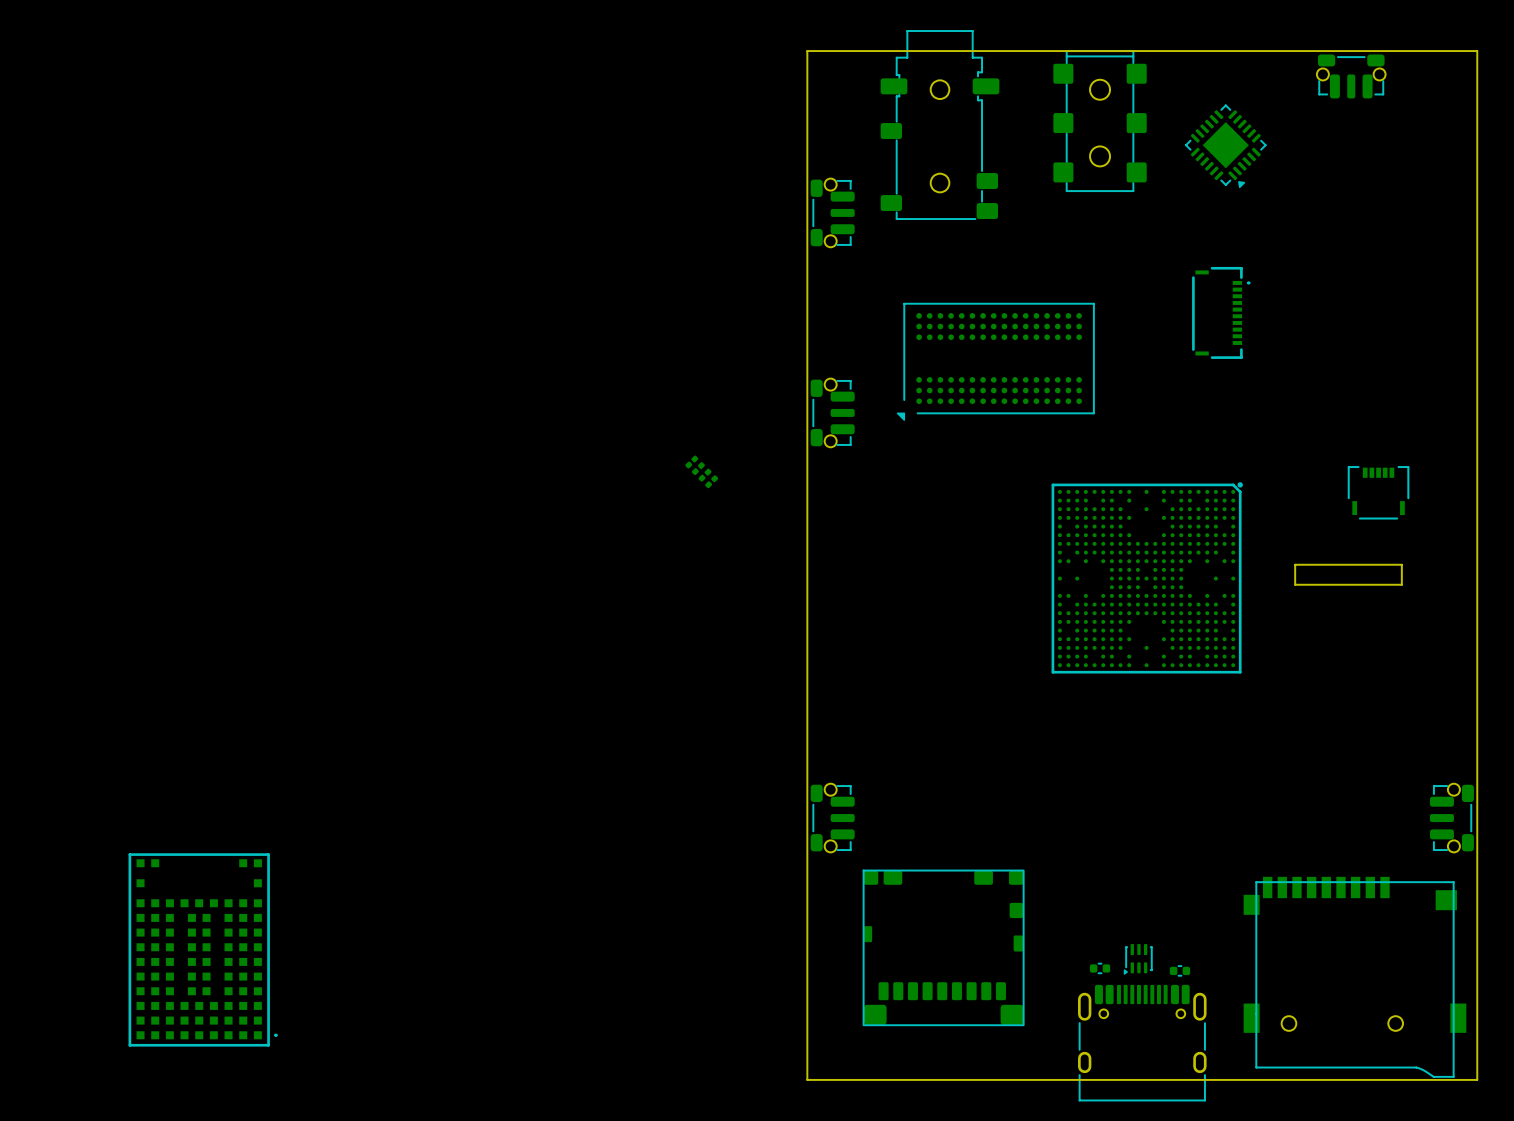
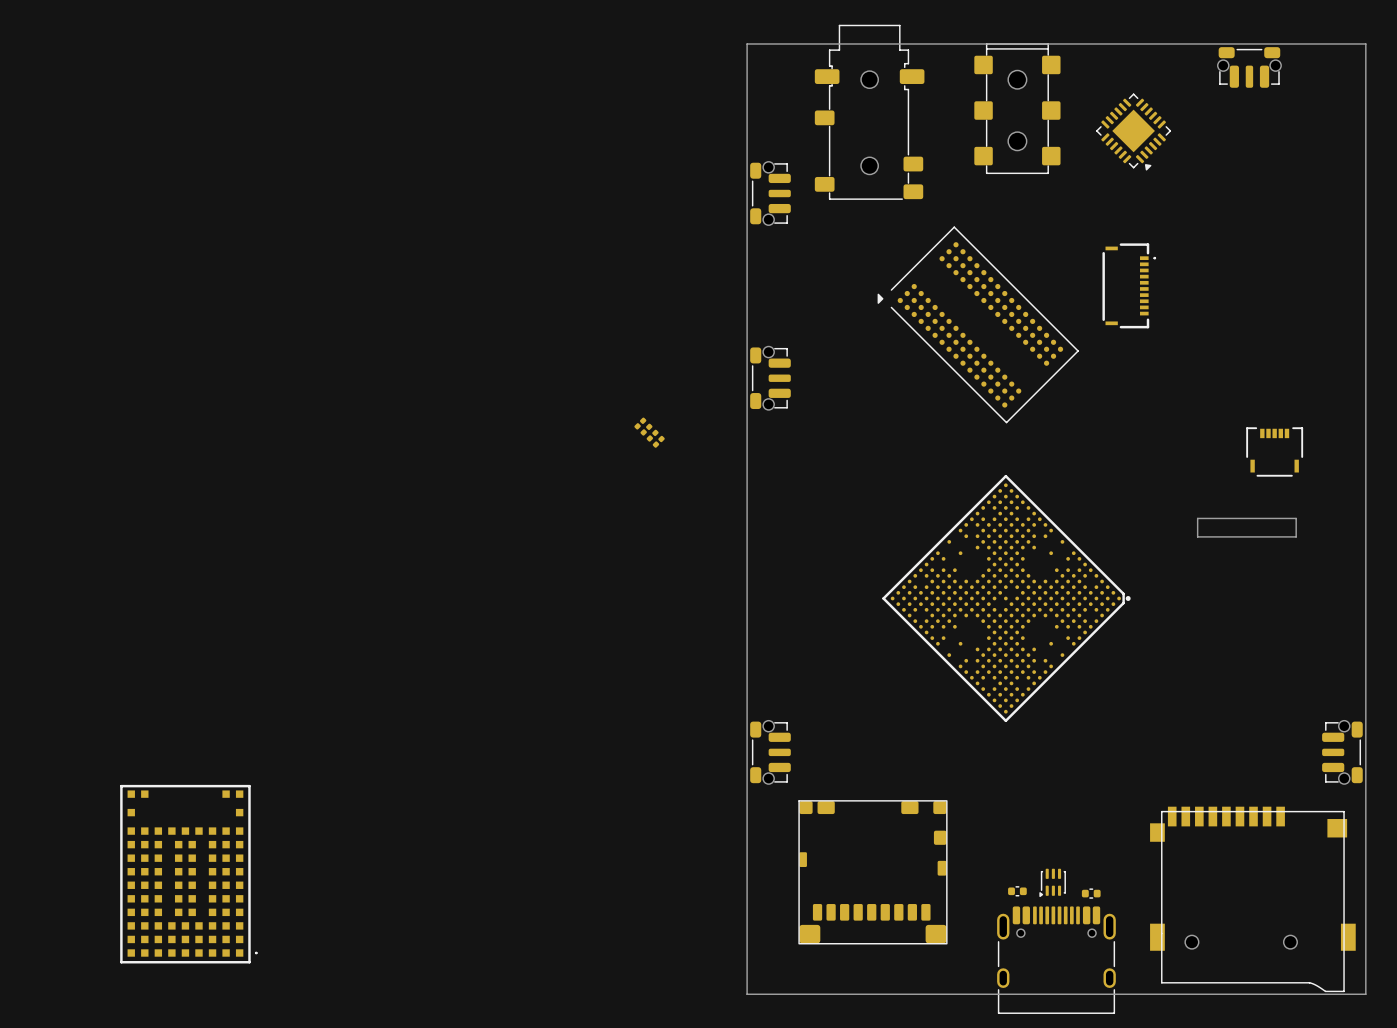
part: none -> (978, 324)
part: (995, 361) -> none
part: (1147, 577) -> none
part: none -> (1006, 598)

